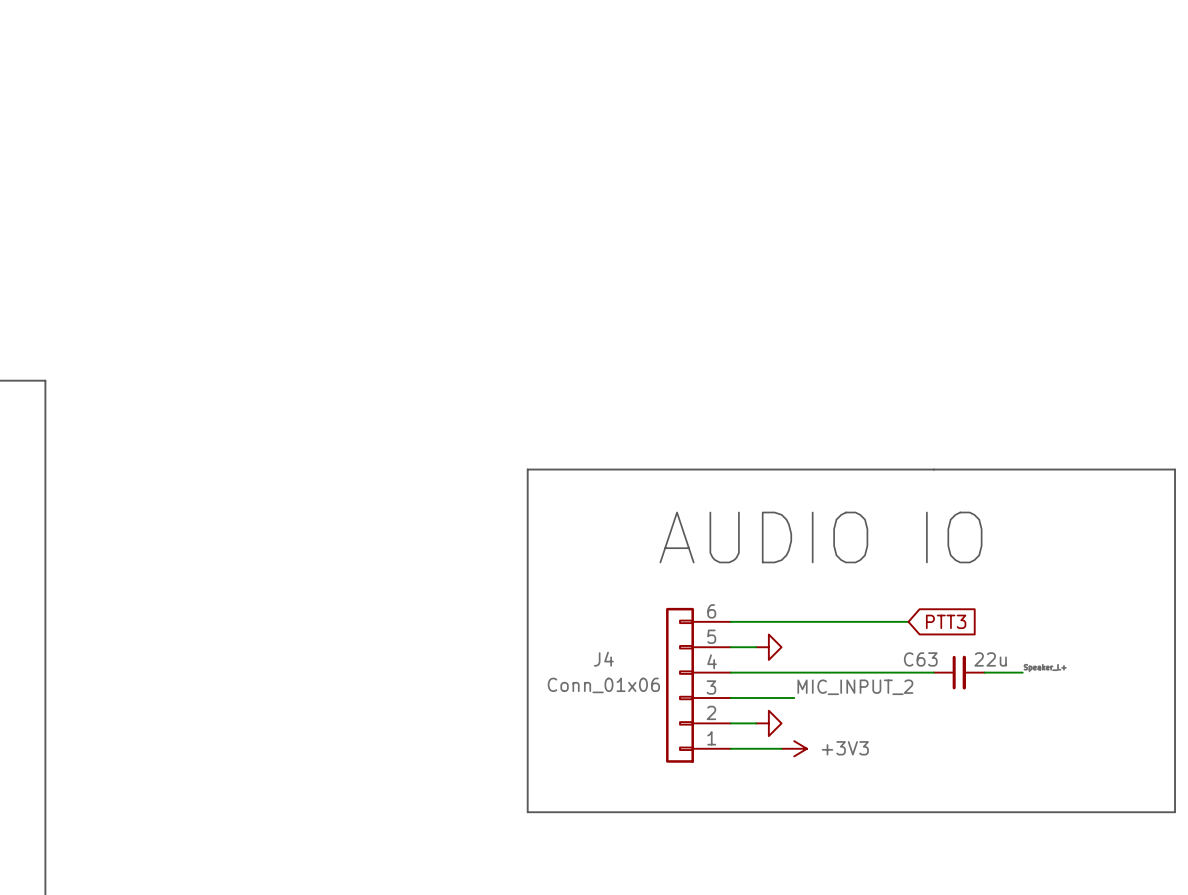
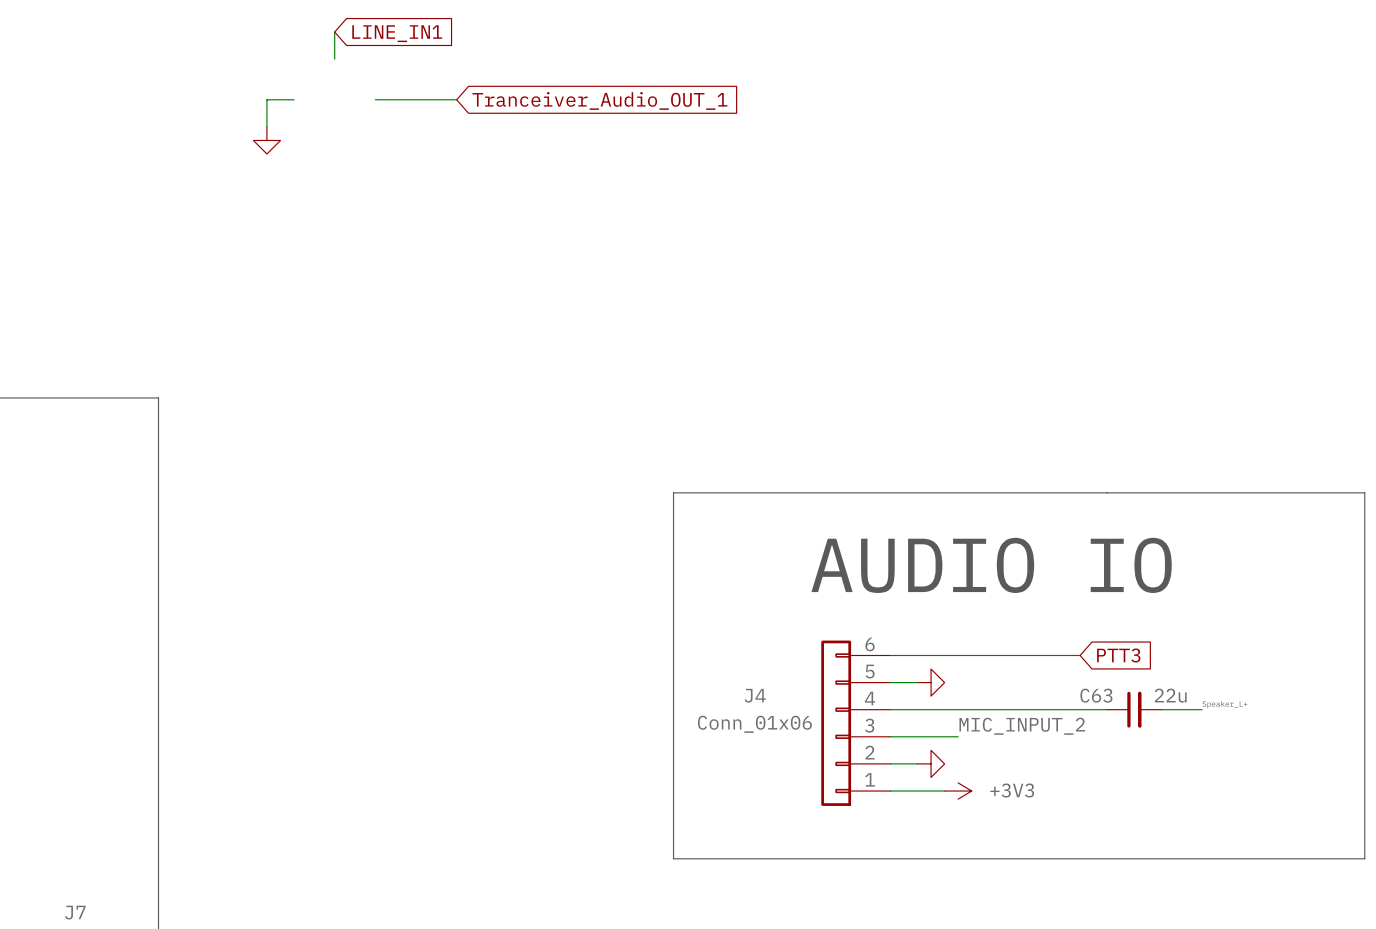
wire: none -> (334, 32) (334, 59)
global label: none -> LINE_IN1 (397, 33)
wire: none -> (294, 99) (266, 99) (266, 126)
wire: none -> (375, 99) (456, 99)
global label: none -> Tranceiver_Audio_OUT_1 (599, 100)
power symbol: none -> (266, 140)

